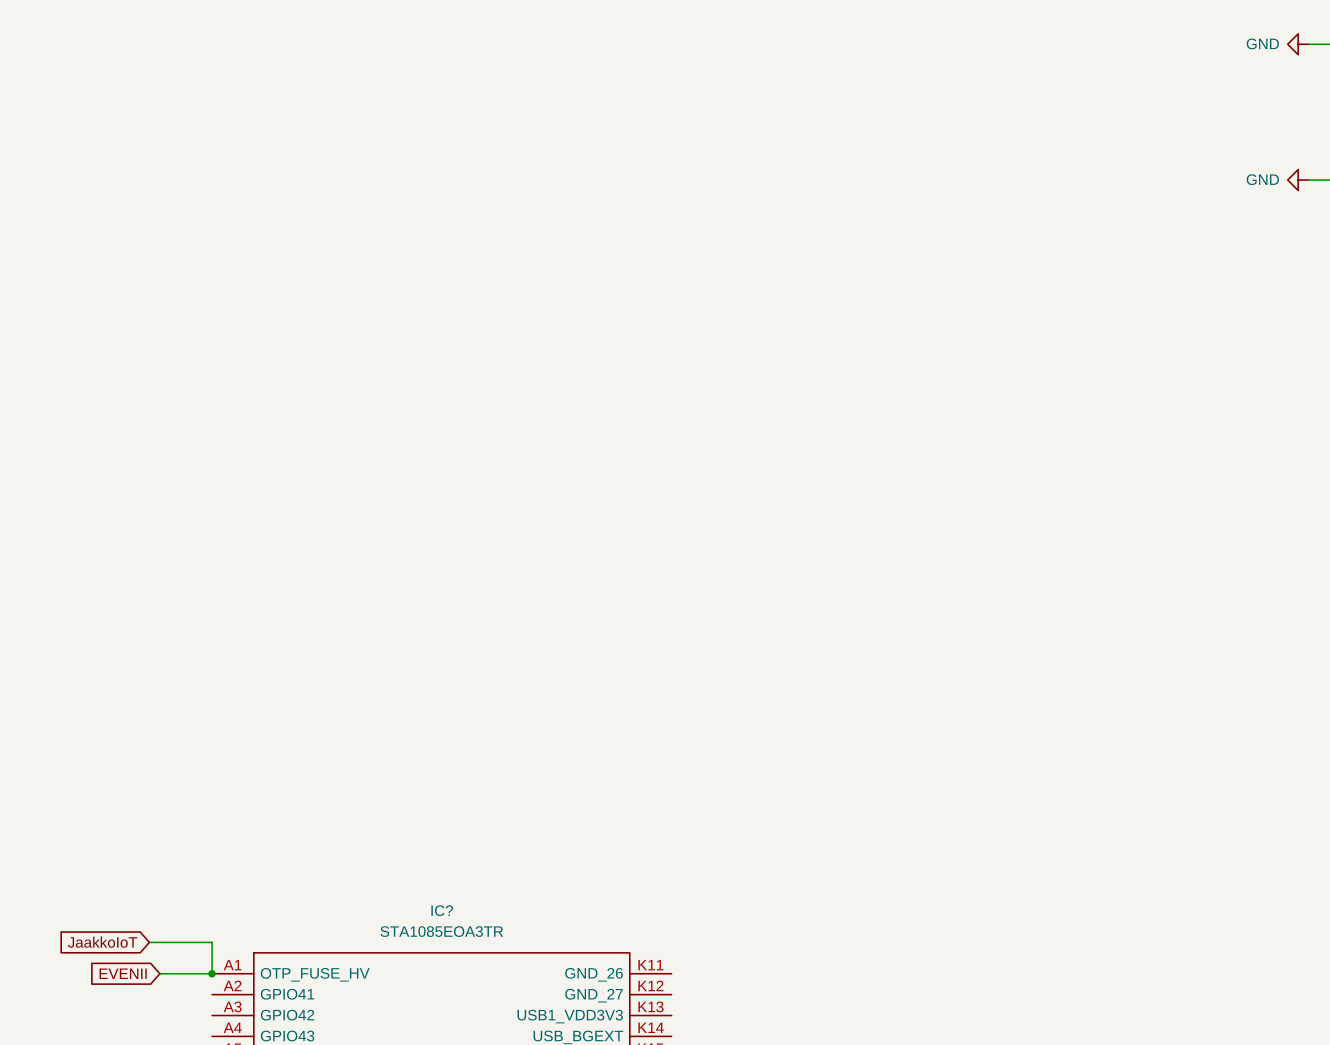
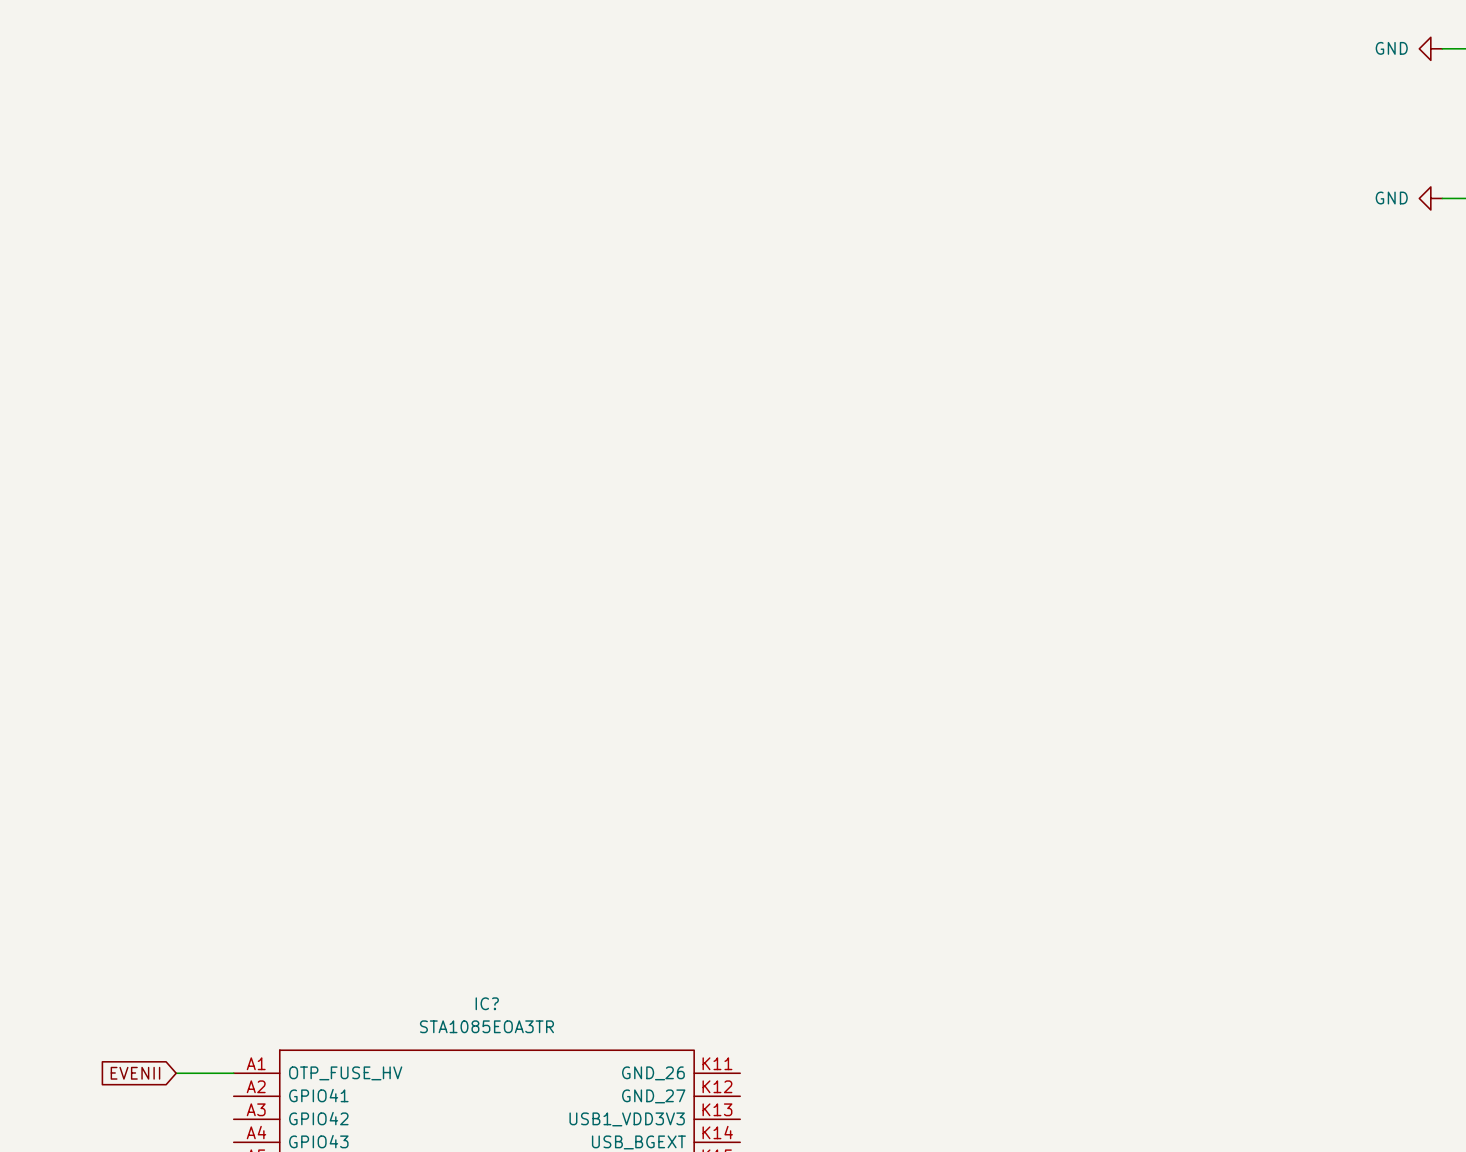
global label: JaakkoIoT (102, 942) -> none
wire: (149, 942) (212, 942) (212, 973) -> none
junction: (212, 973) -> none

